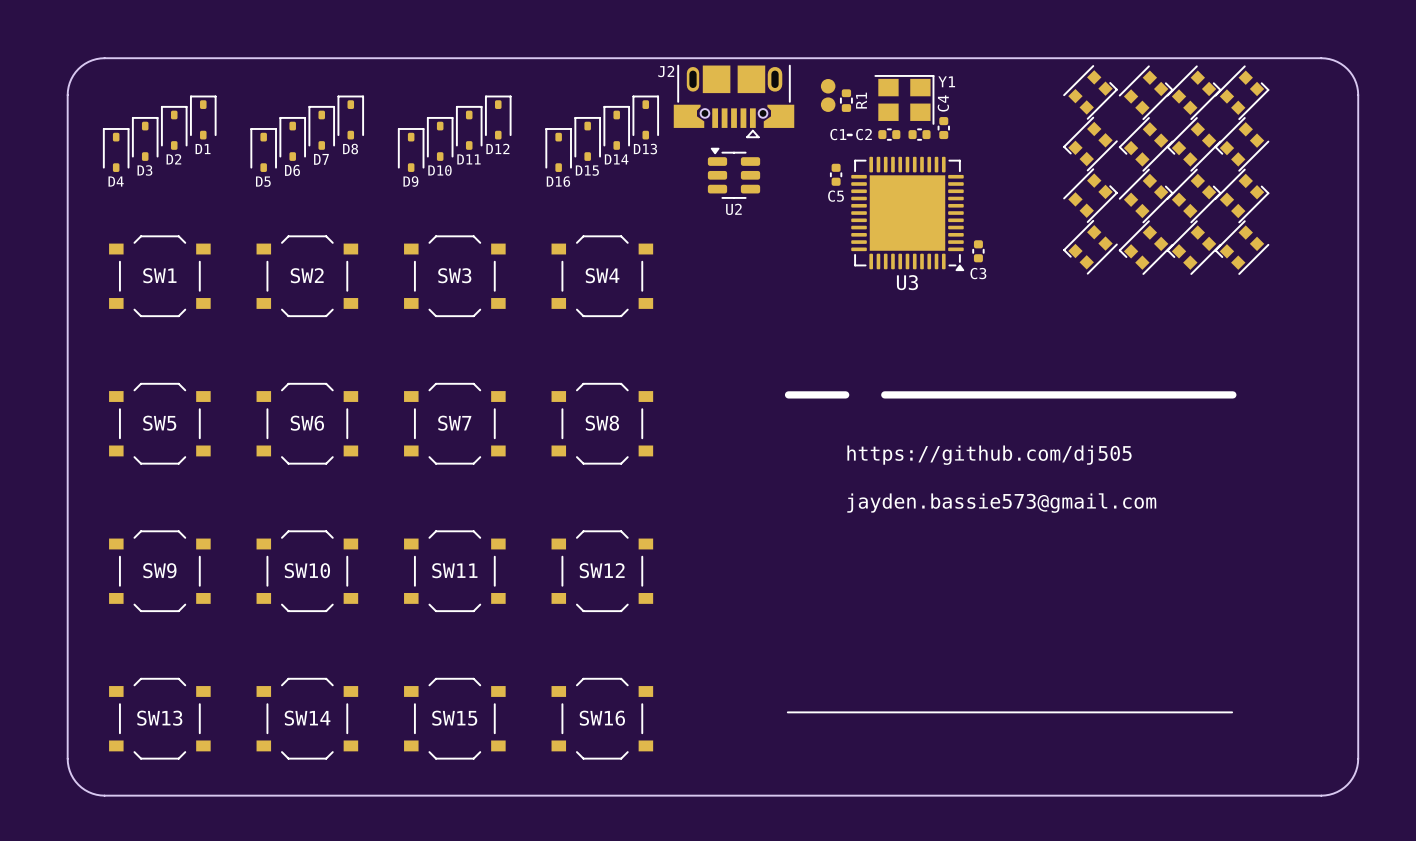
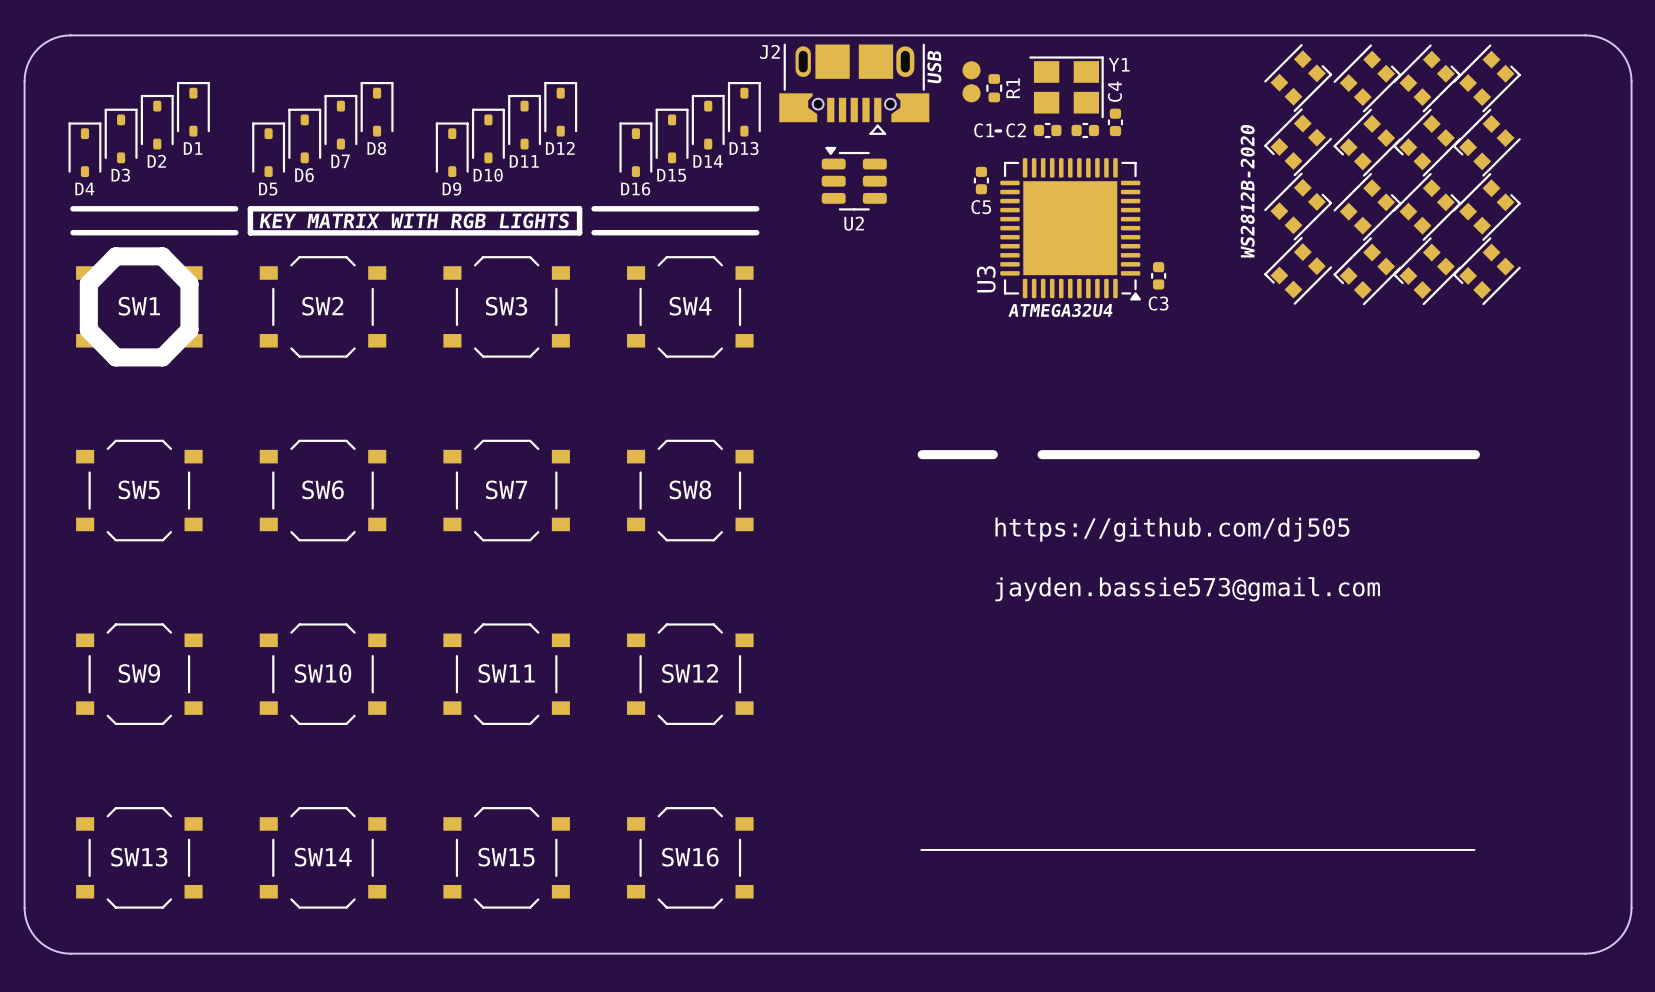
text: none -> USB (934, 67)
text: none -> WS2812B-2020 (1247, 191)
line: none -> (72, 208) (235, 208)
line: none -> (250, 208) (579, 208) (579, 232) (250, 232) (250, 208)
line: none -> (594, 208) (756, 208)
text: none -> KEY MATRIX WITH RGB LIGHTS (414, 220)
line: none -> (73, 232) (235, 232)
line: none -> (594, 232) (756, 232)
line: none -> (115, 256) (162, 256) (189, 283) (189, 329) (162, 357) (115, 357) (88, 329) (88, 283) (115, 256)
text: none -> ATMEGA32U4 (1060, 310)
U3 name rotation: 0° (907, 282) -> 90° counterclockwise (986, 279)
U3 name position: U3 (907, 282) -> U3 (986, 279)

